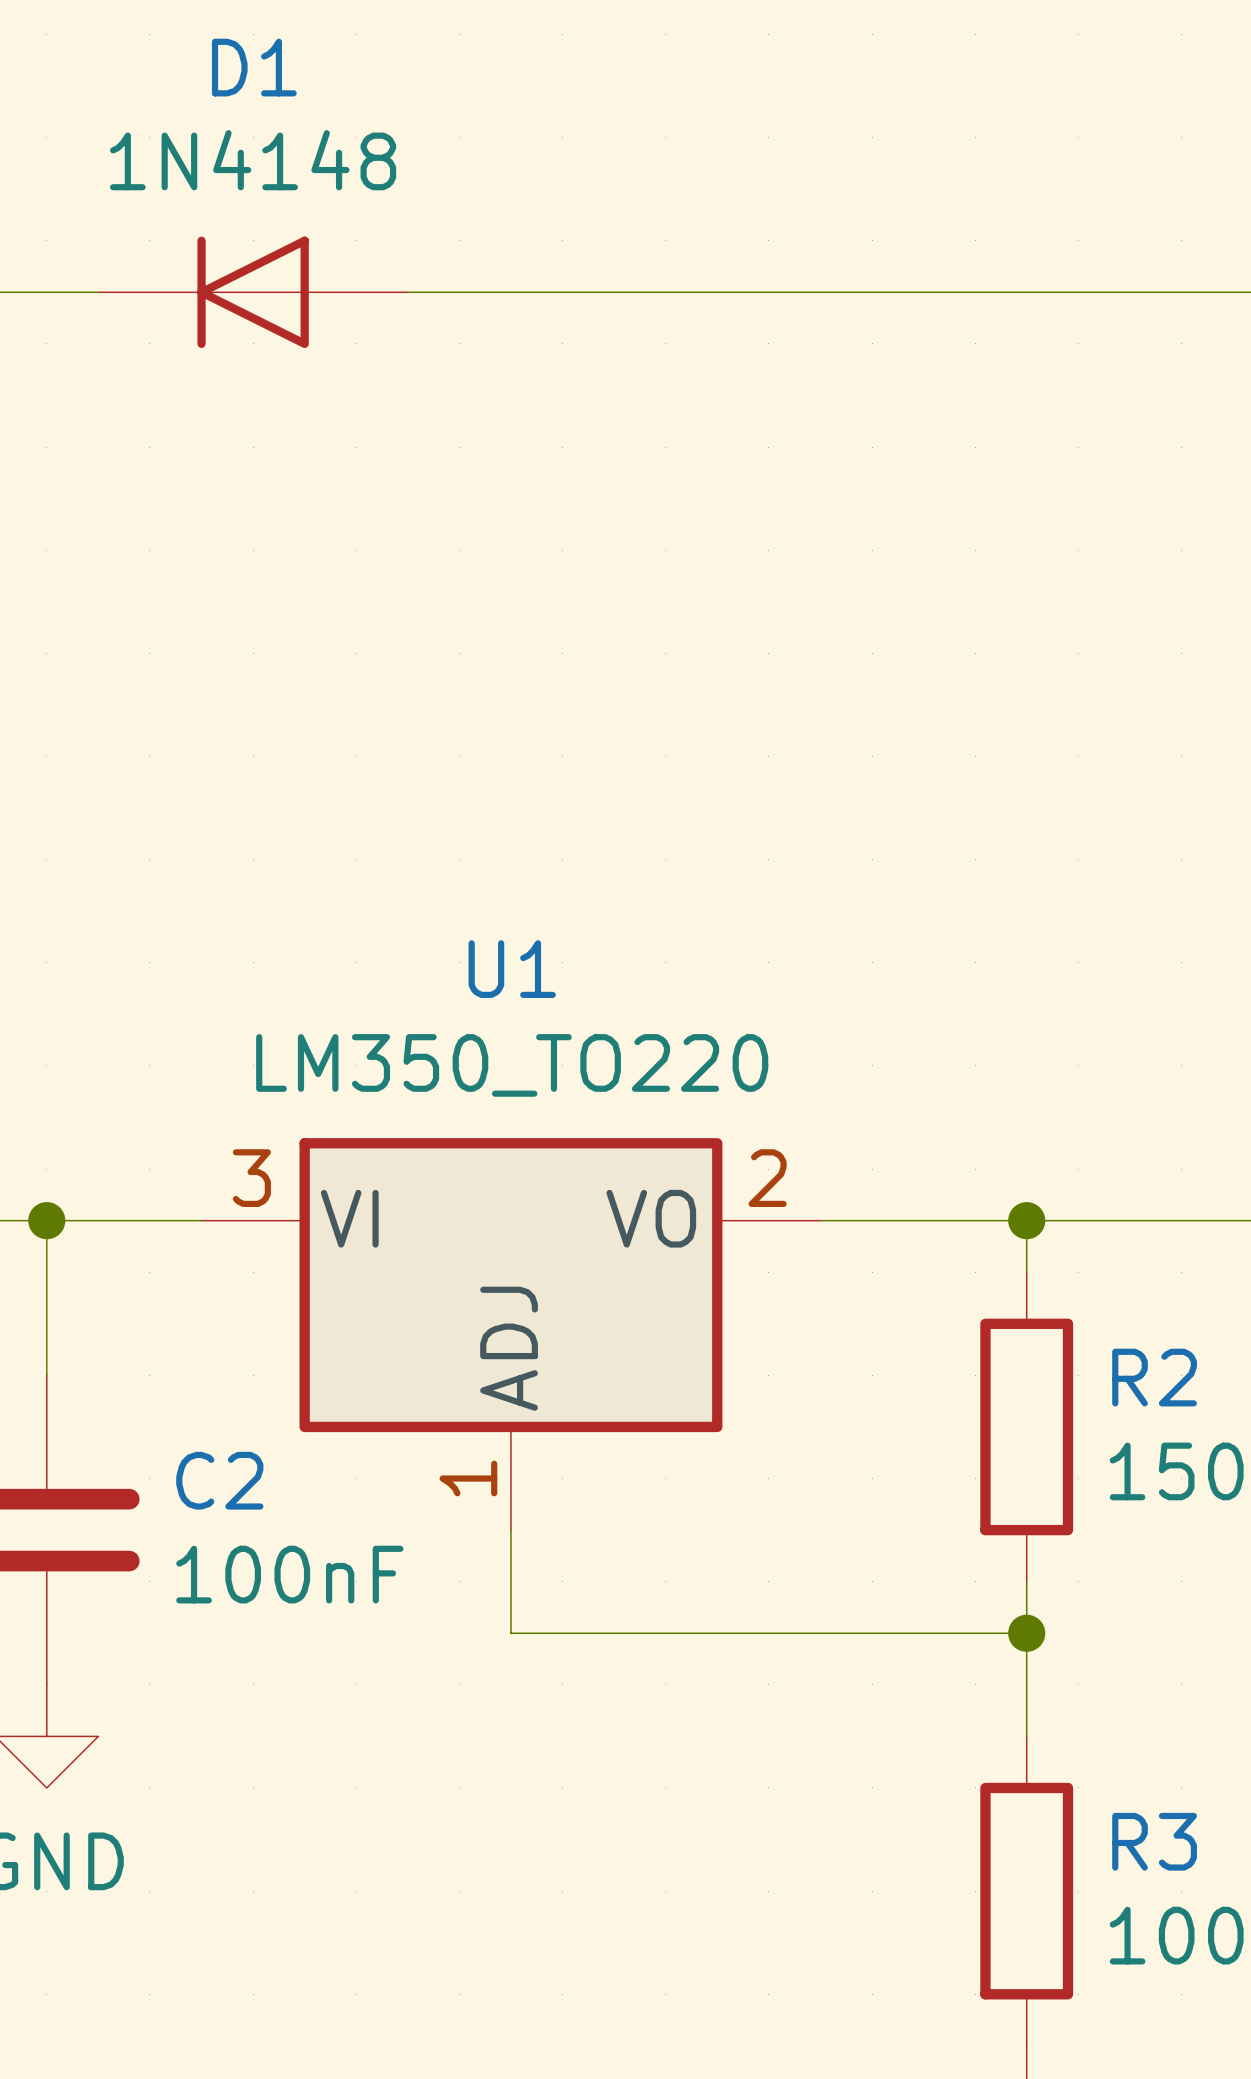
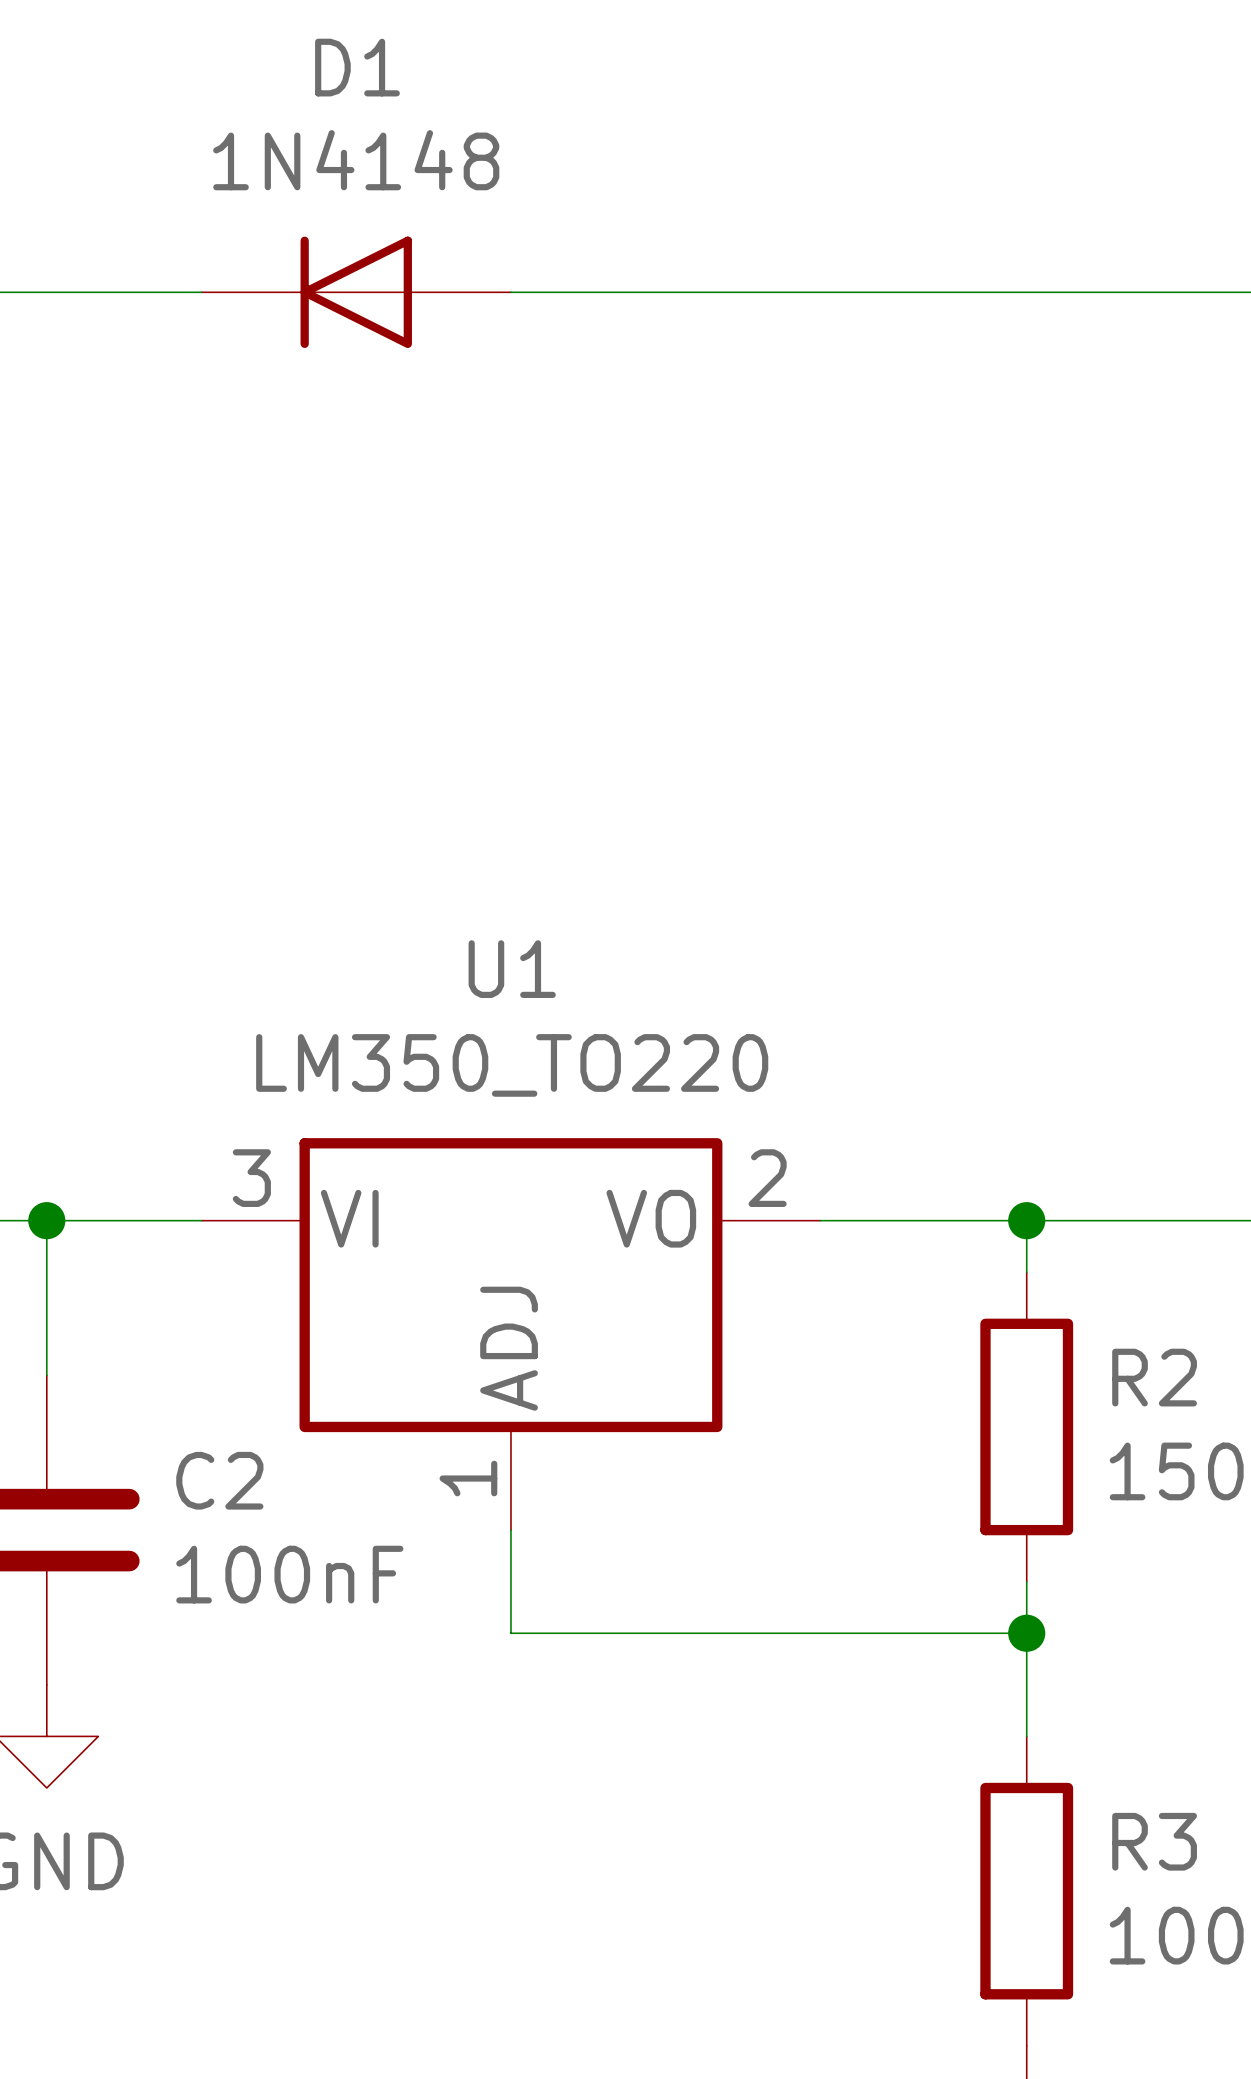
D1 position: (253, 292) -> (356, 292)

